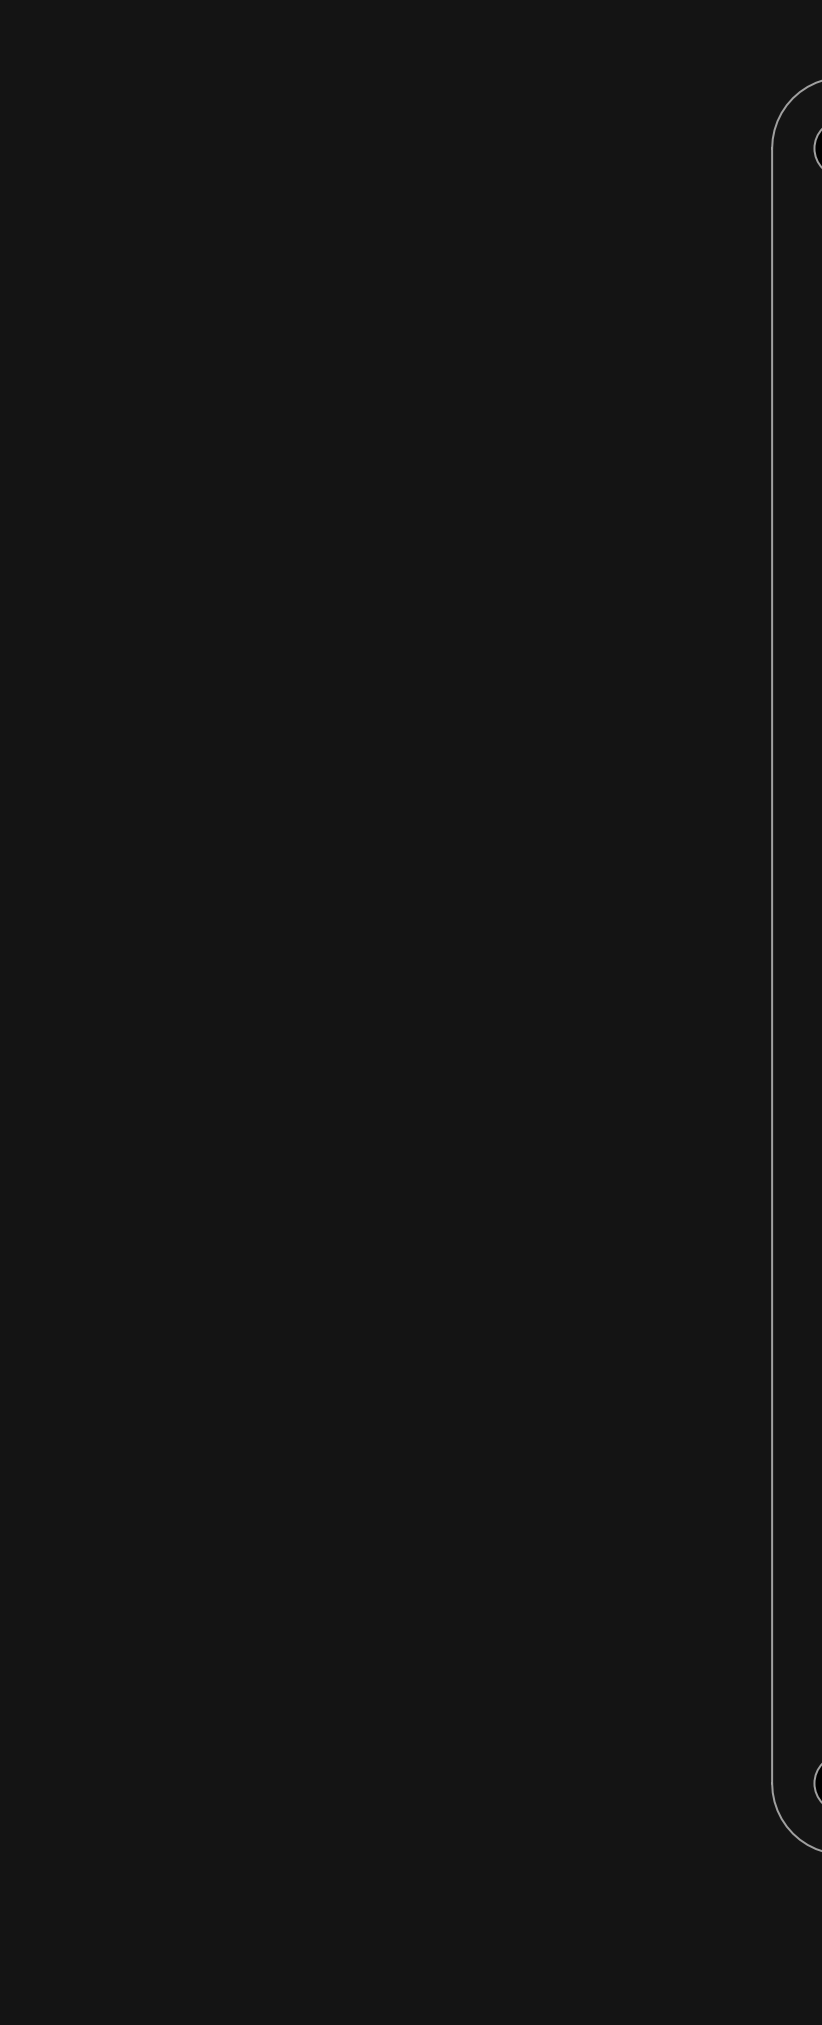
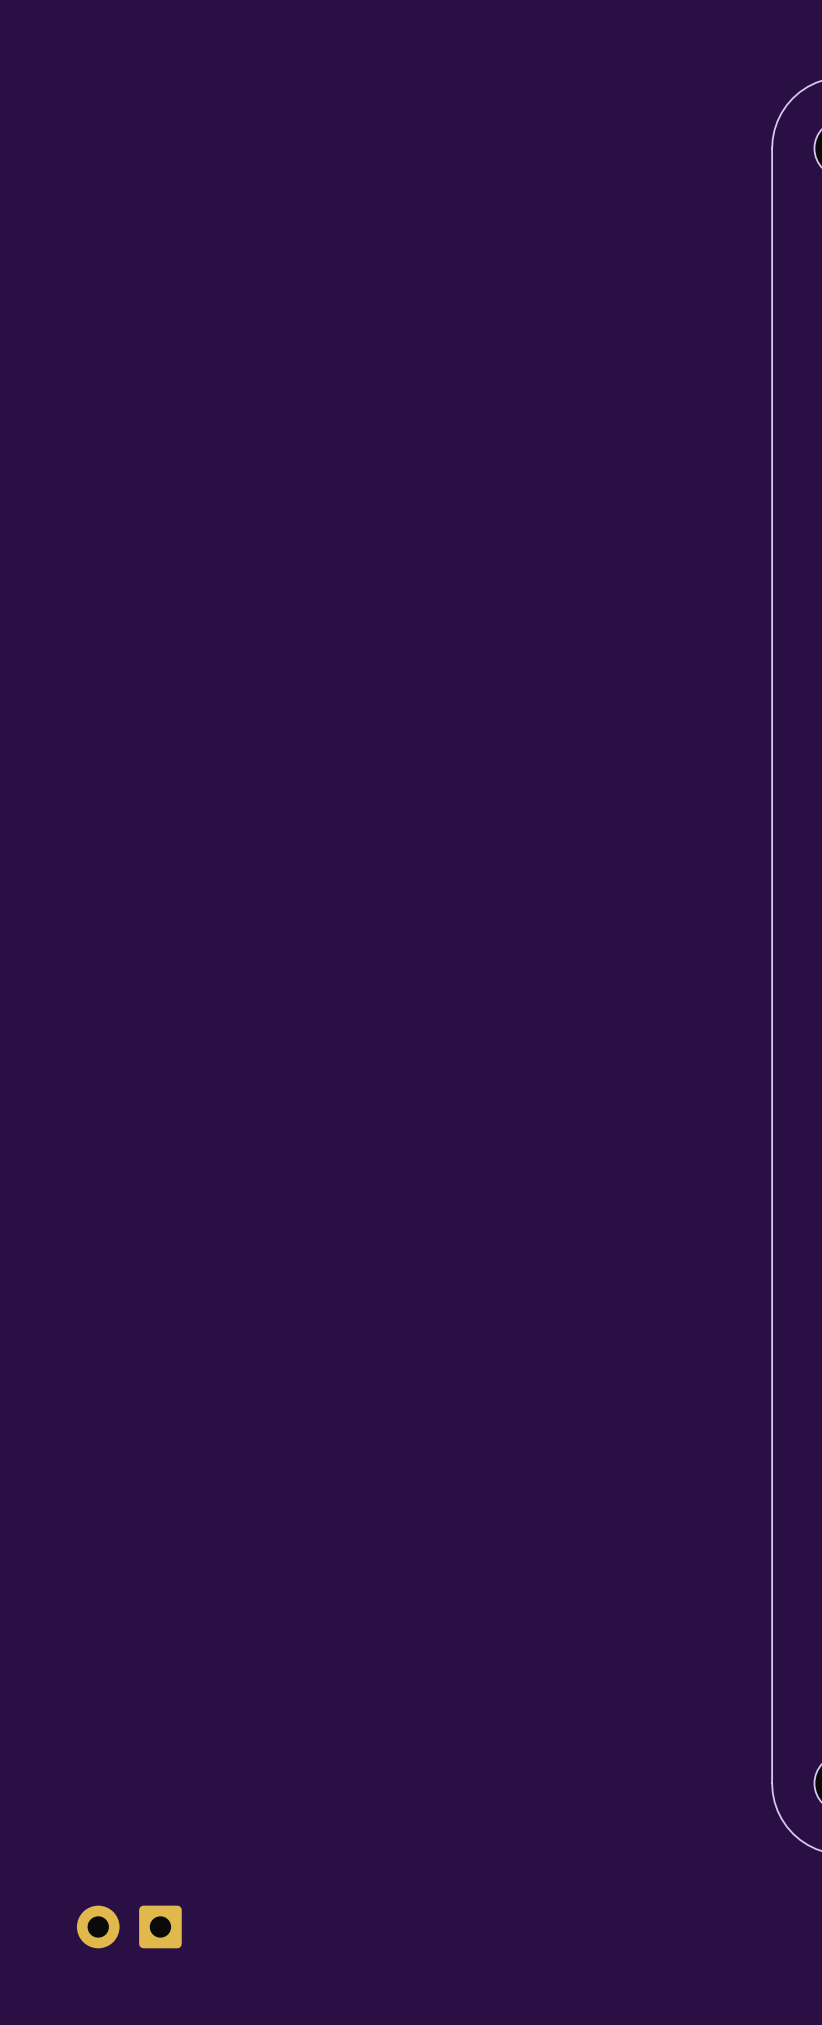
part: none -> (129, 1926)

